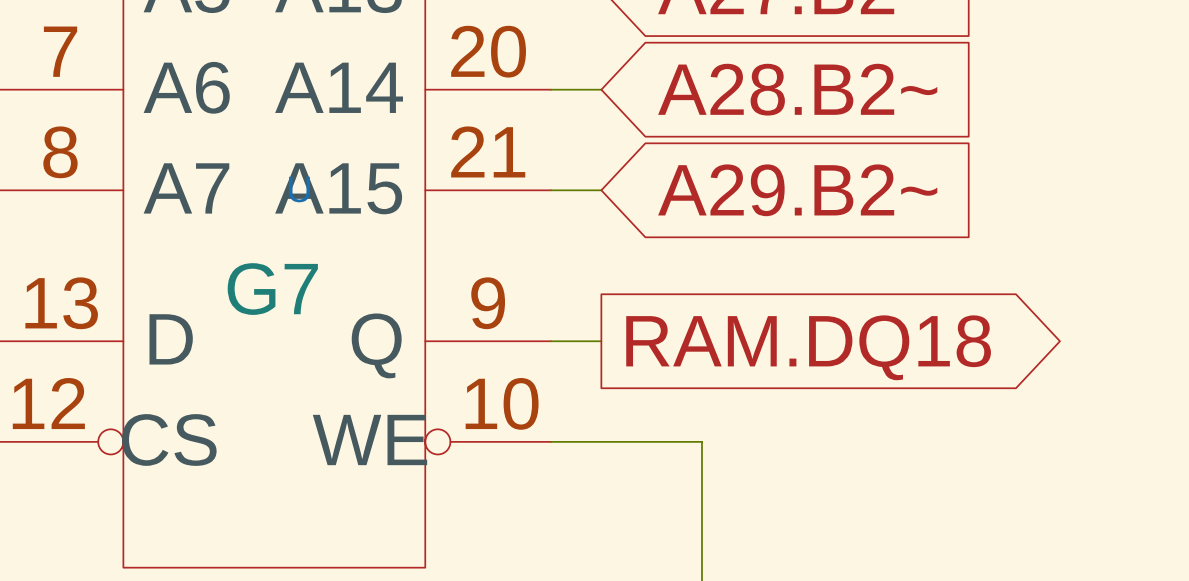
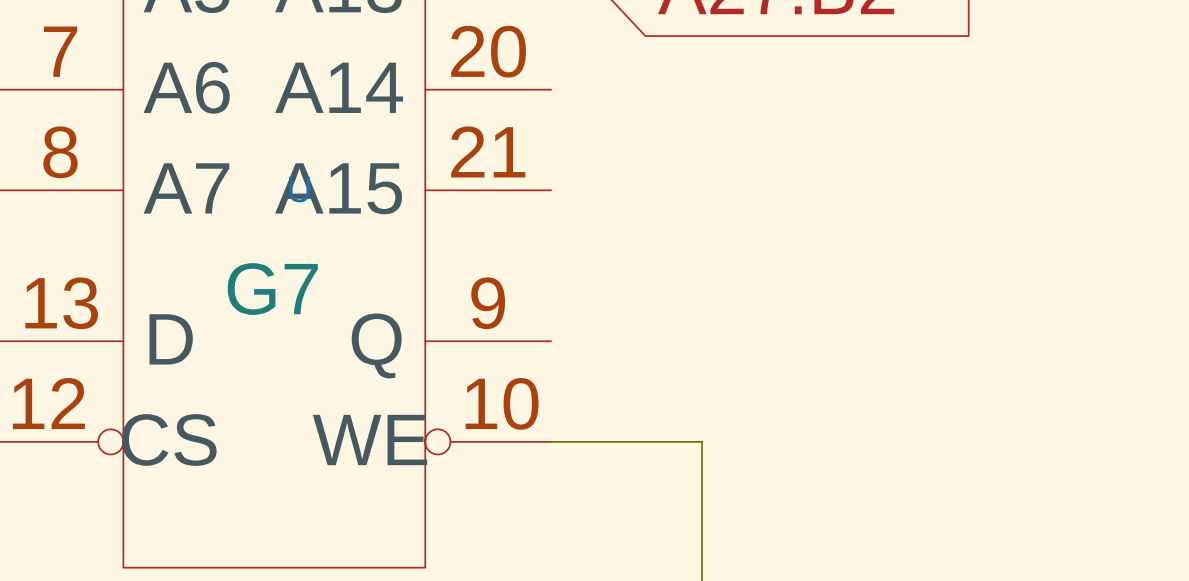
wire: (551, 89) (601, 89) -> none
global label: A28.B2~ (797, 89) -> none
wire: (551, 190) (601, 190) -> none
global label: A29.B2~ (797, 190) -> none
wire: (551, 341) (601, 341) -> none
global label: RAM.DQ18 (808, 347) -> none

